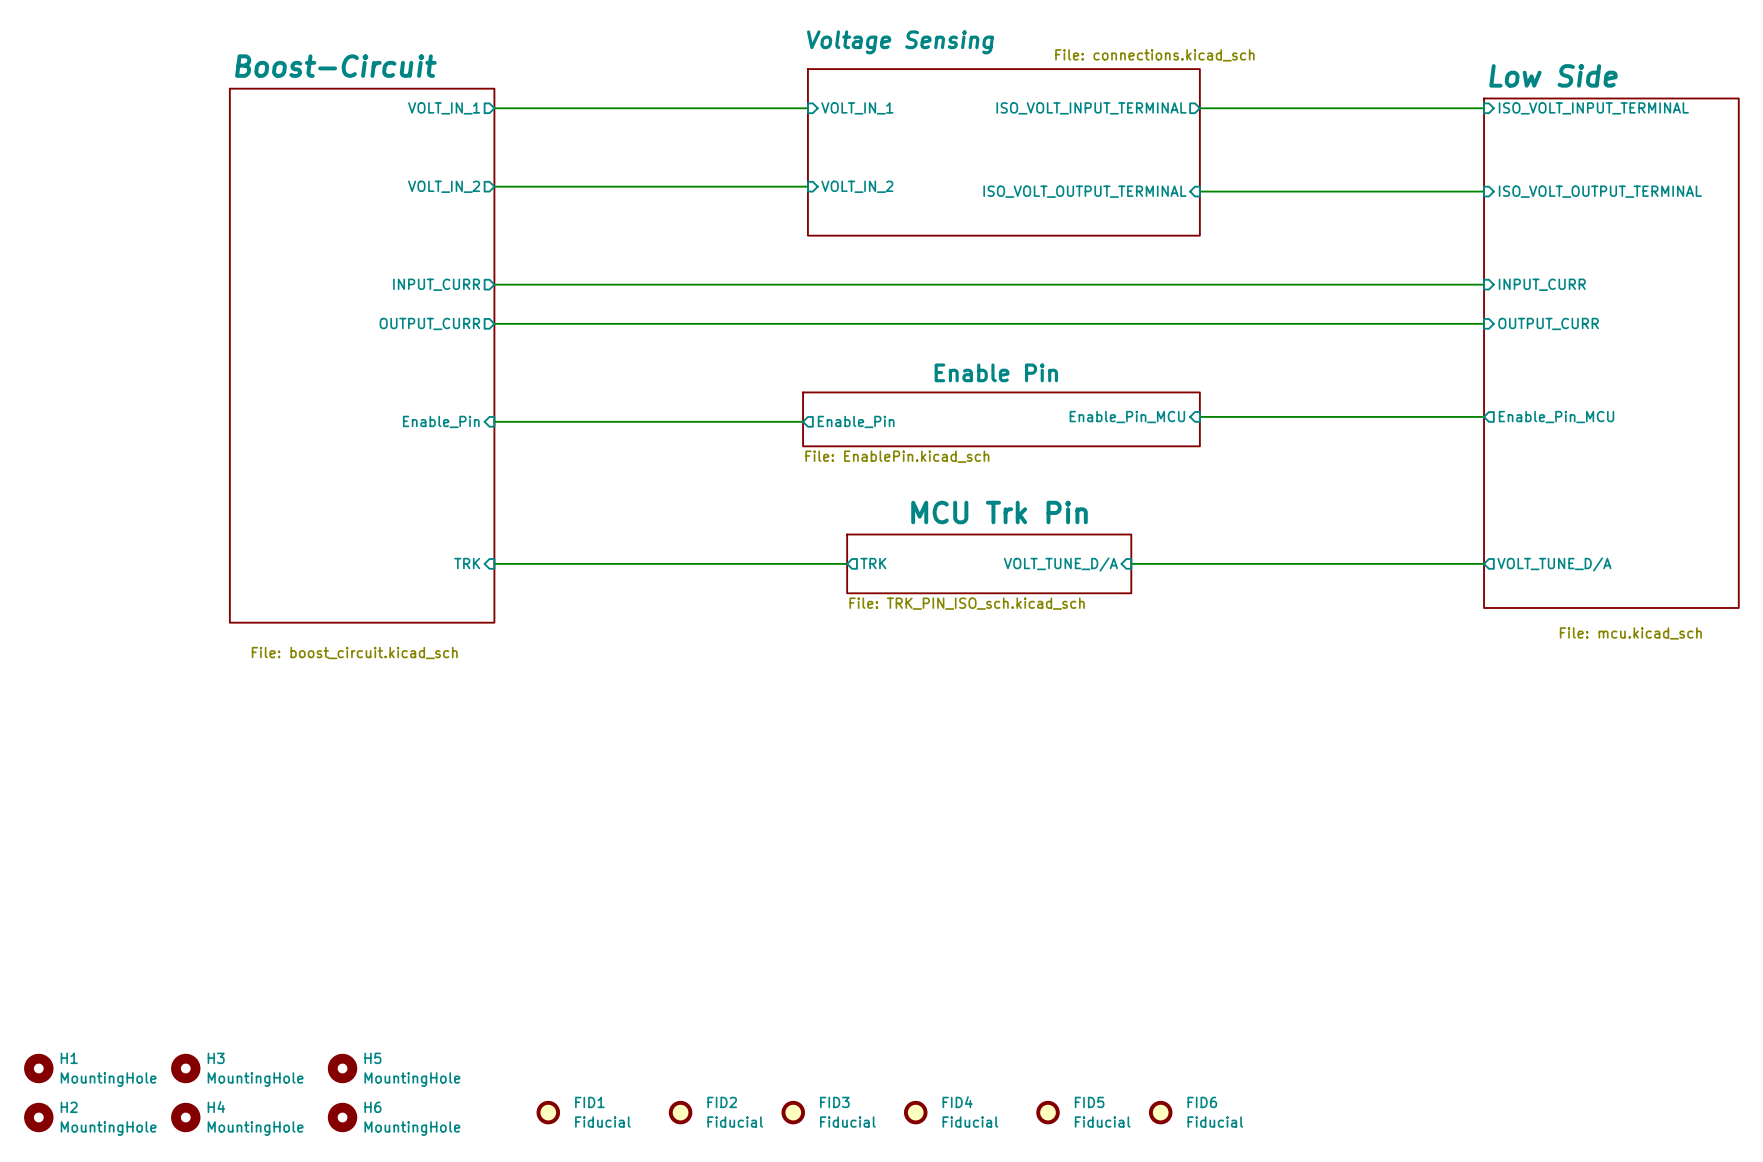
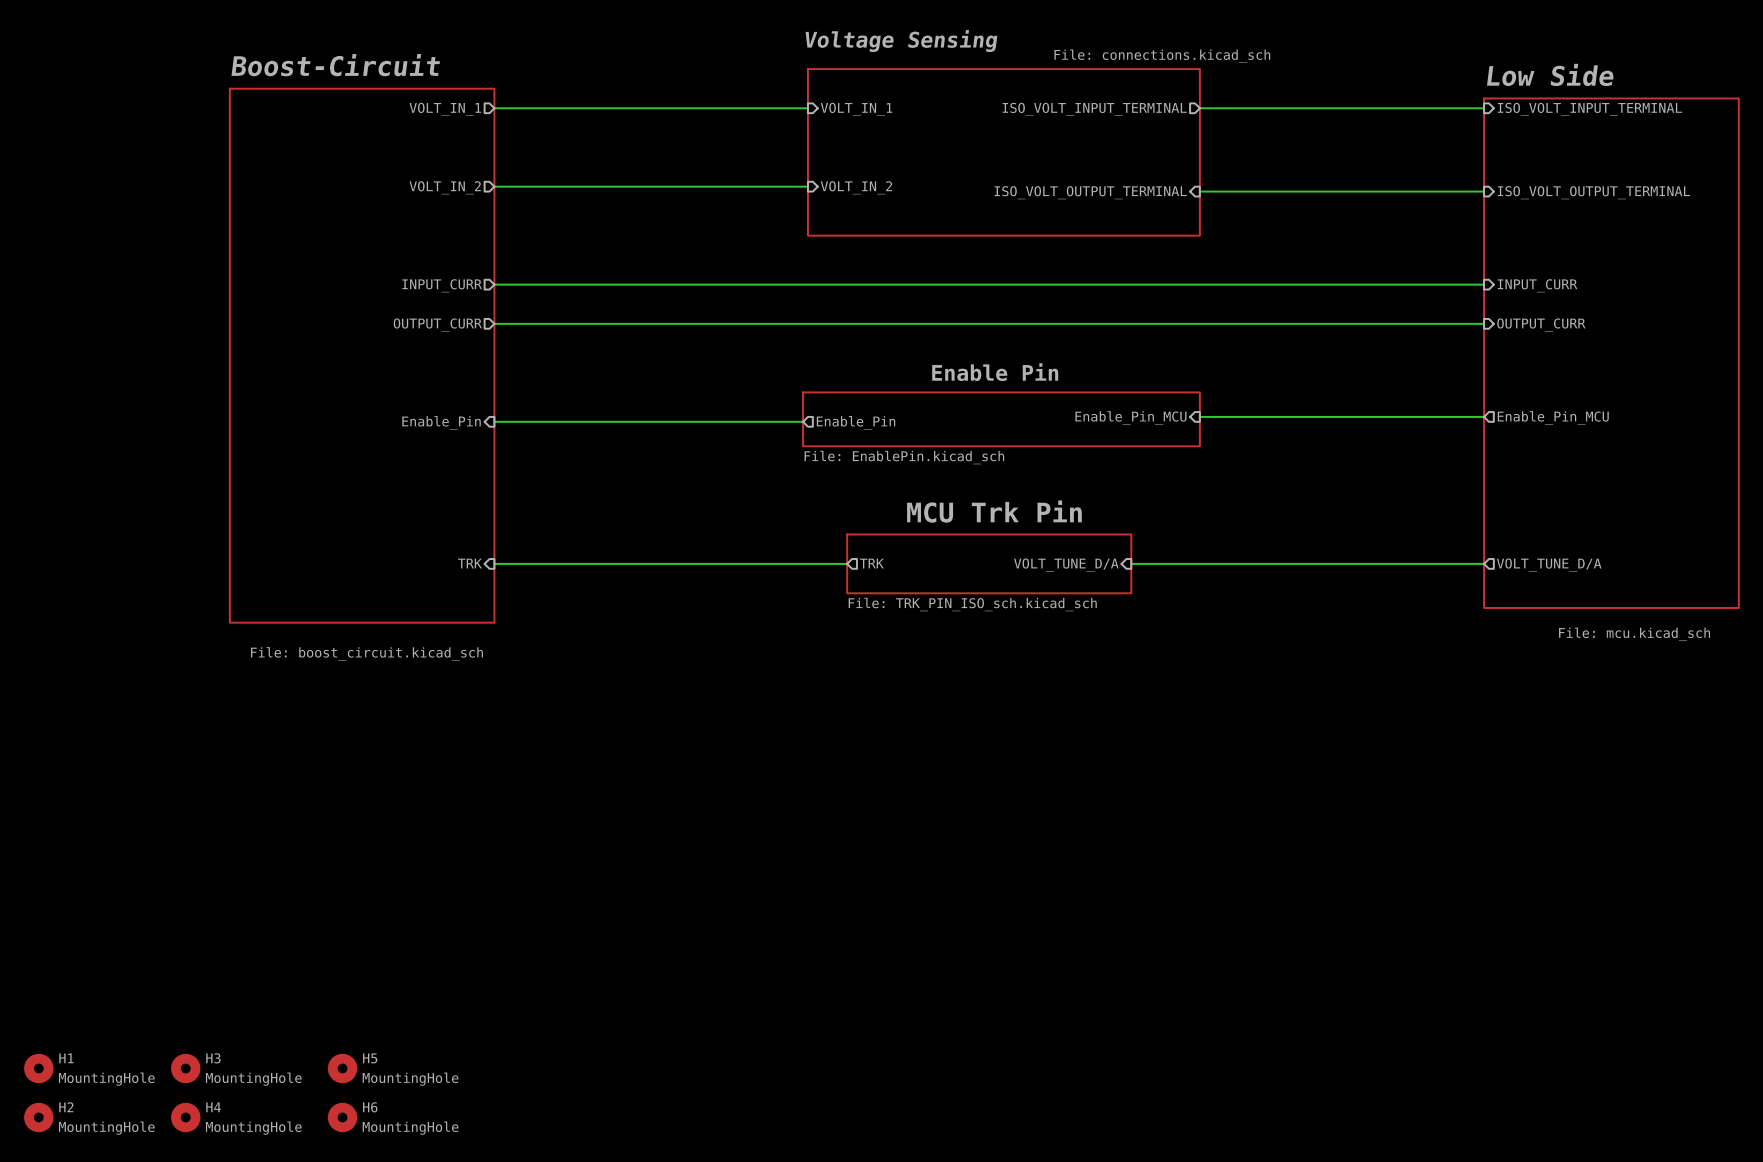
FID1: Fiducial (548, 1112) -> none
FID2: Fiducial (680, 1112) -> none
FID3: Fiducial (793, 1112) -> none
FID4: Fiducial (915, 1112) -> none
FID5: Fiducial (1048, 1112) -> none
FID6: Fiducial (1160, 1112) -> none

